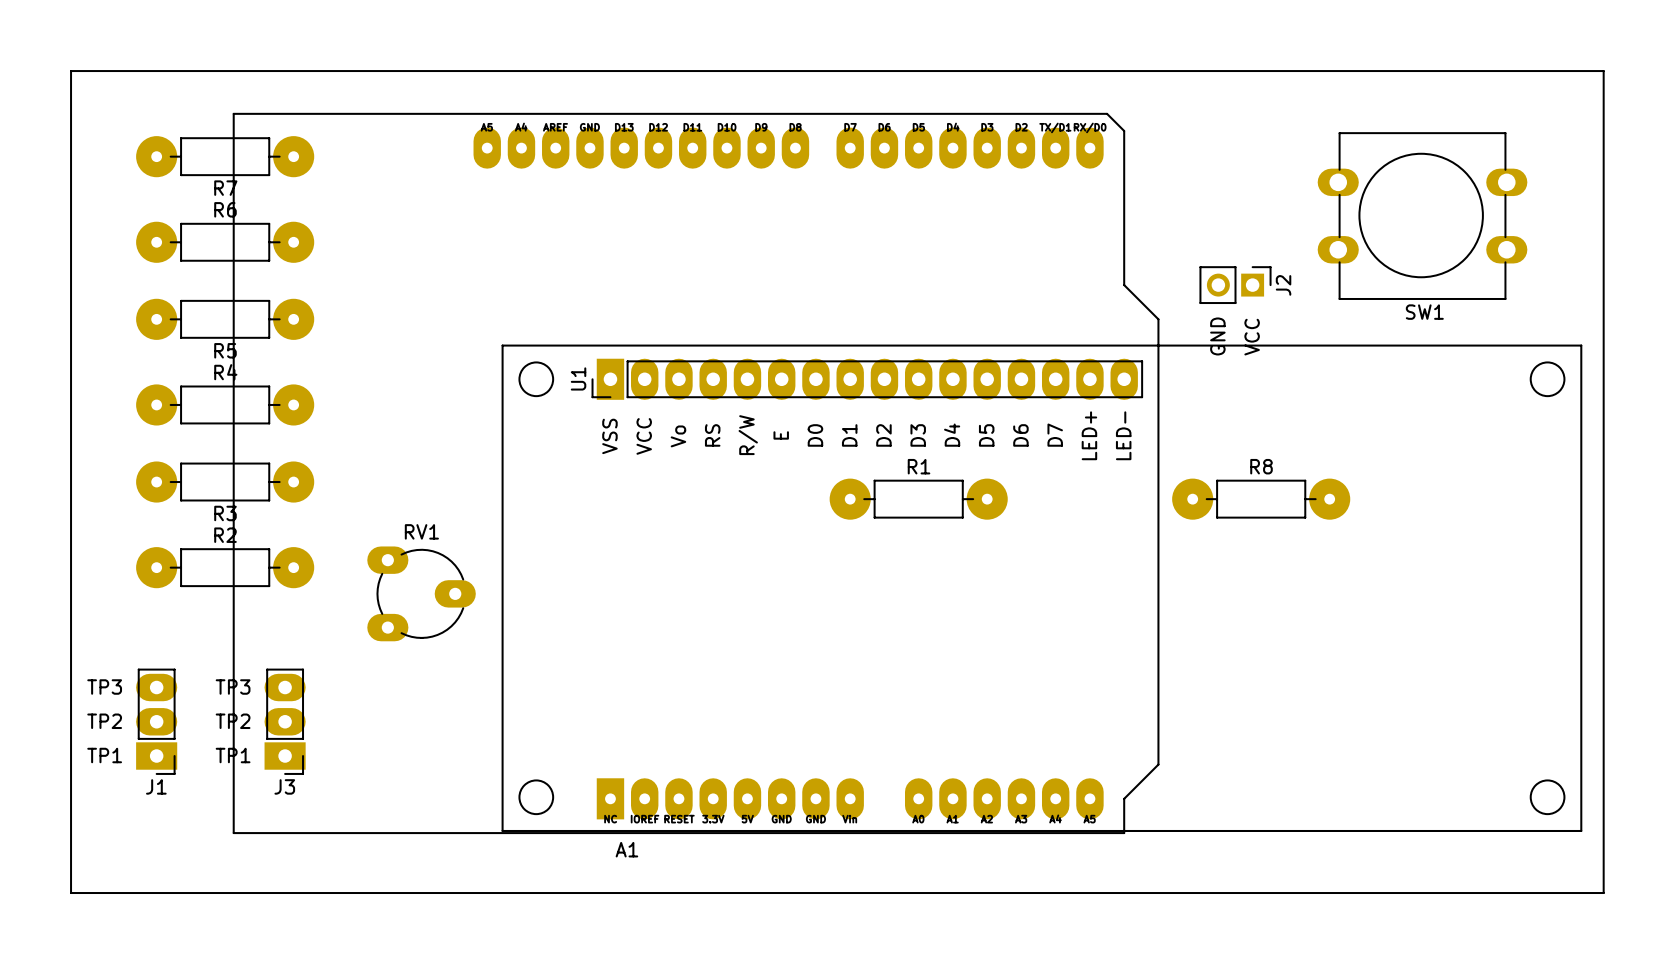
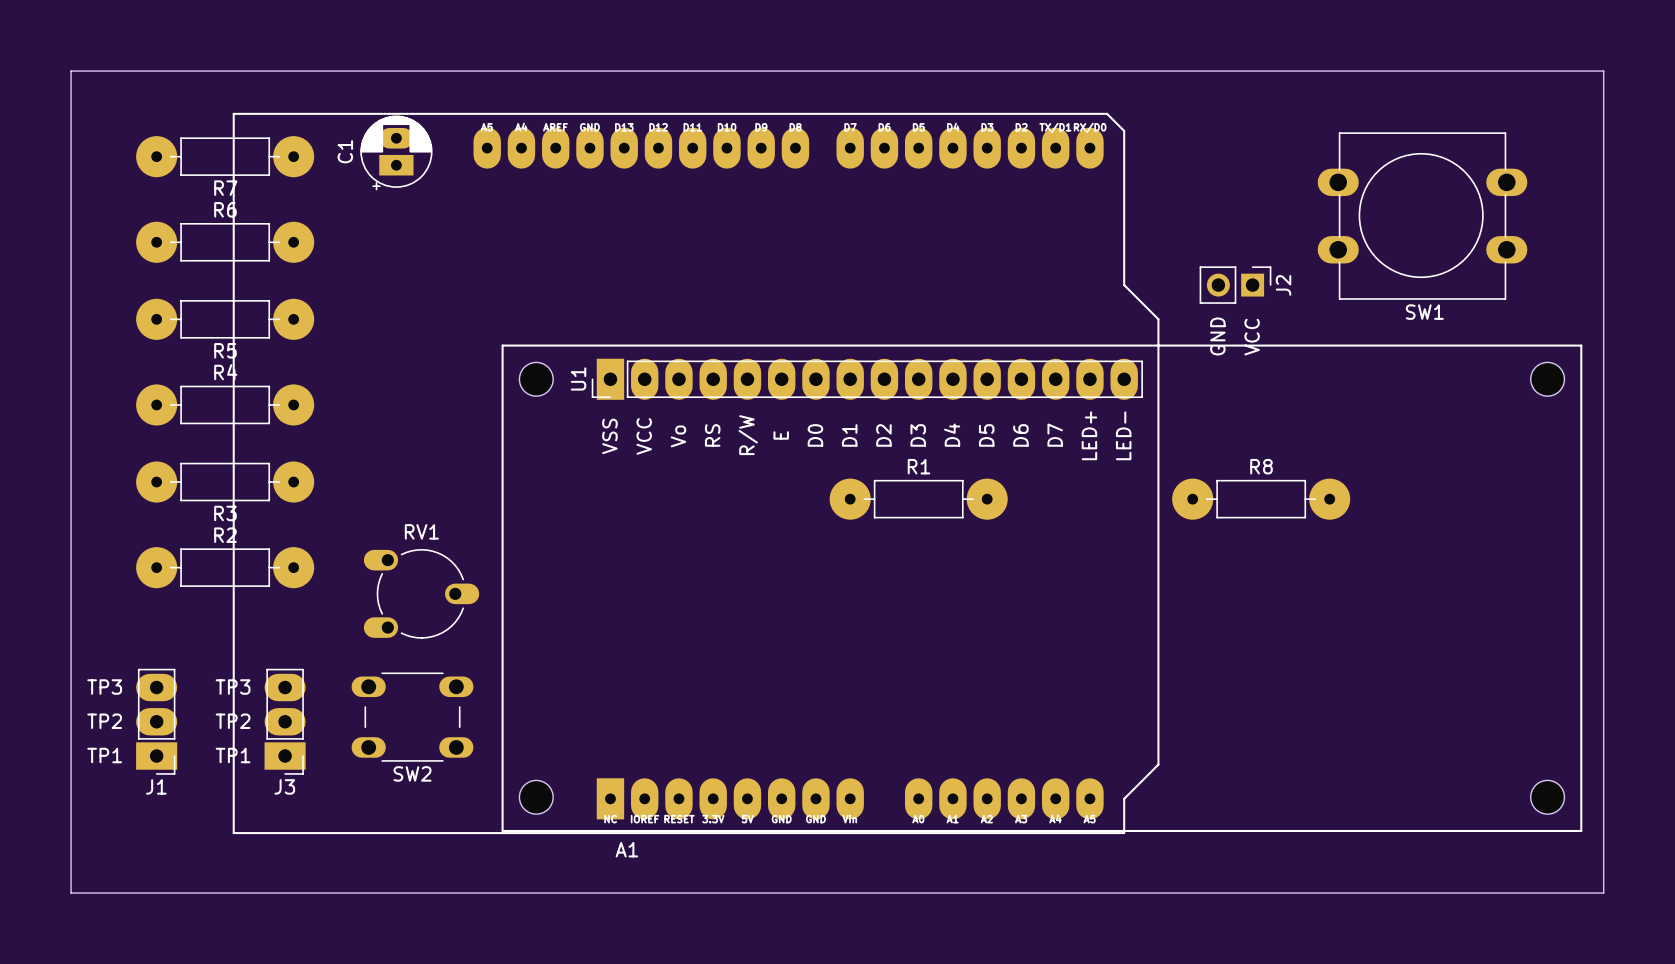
C1: none -> (396, 152)
RV1 footprint: [367, 546, 476, 642] -> [363, 548, 480, 639]
SW2: none -> (412, 717)

